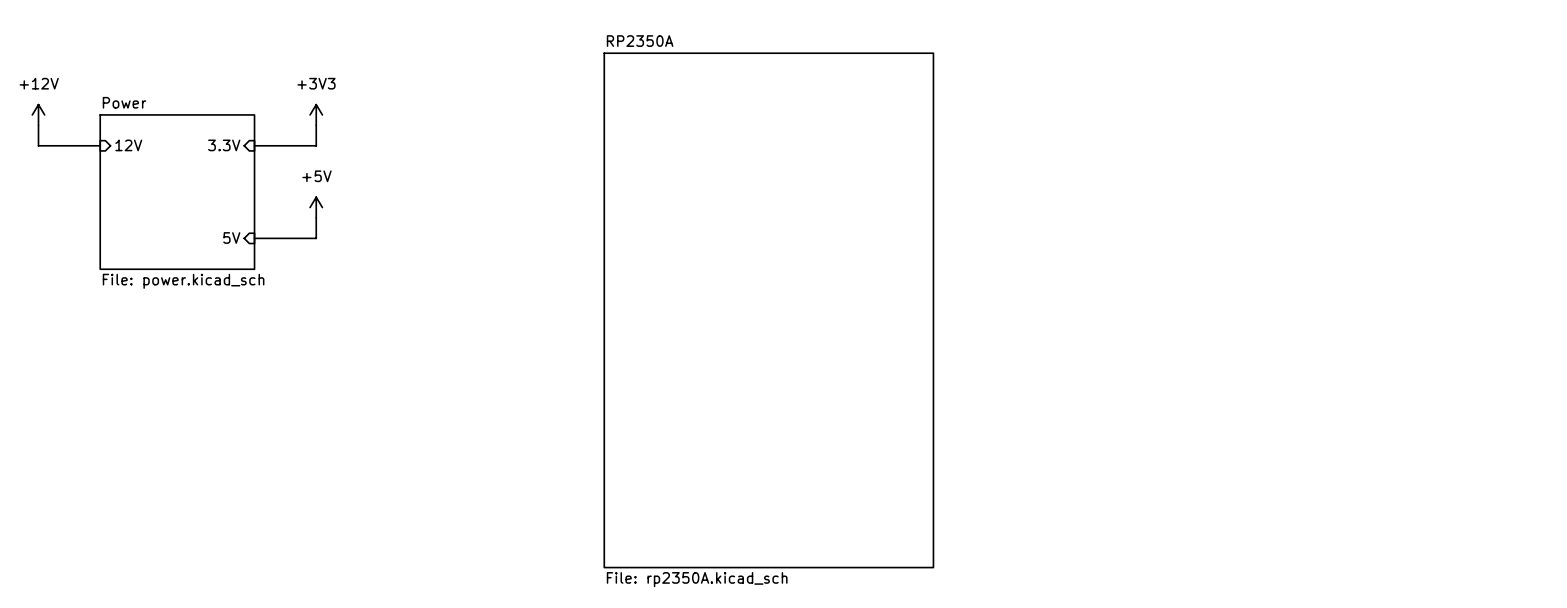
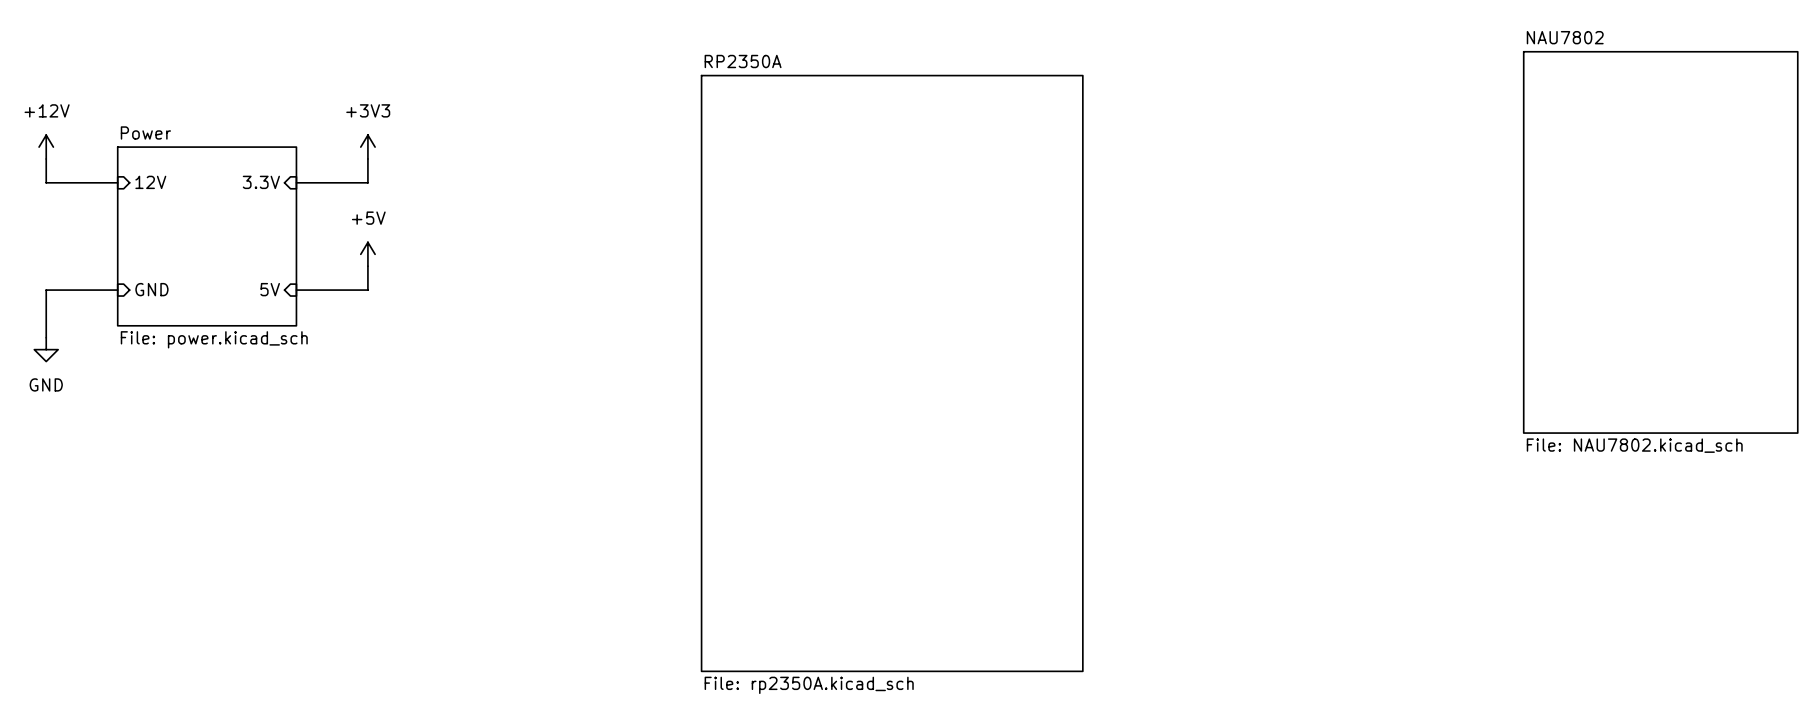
sheet NAU7802: none -> File: NAU7802.kicad_sch (1660, 242)
wire: none -> (117, 290) (46, 290) (46, 337)
sheet pin: none -> GND (151, 289)
power symbol: none -> GND (46, 349)

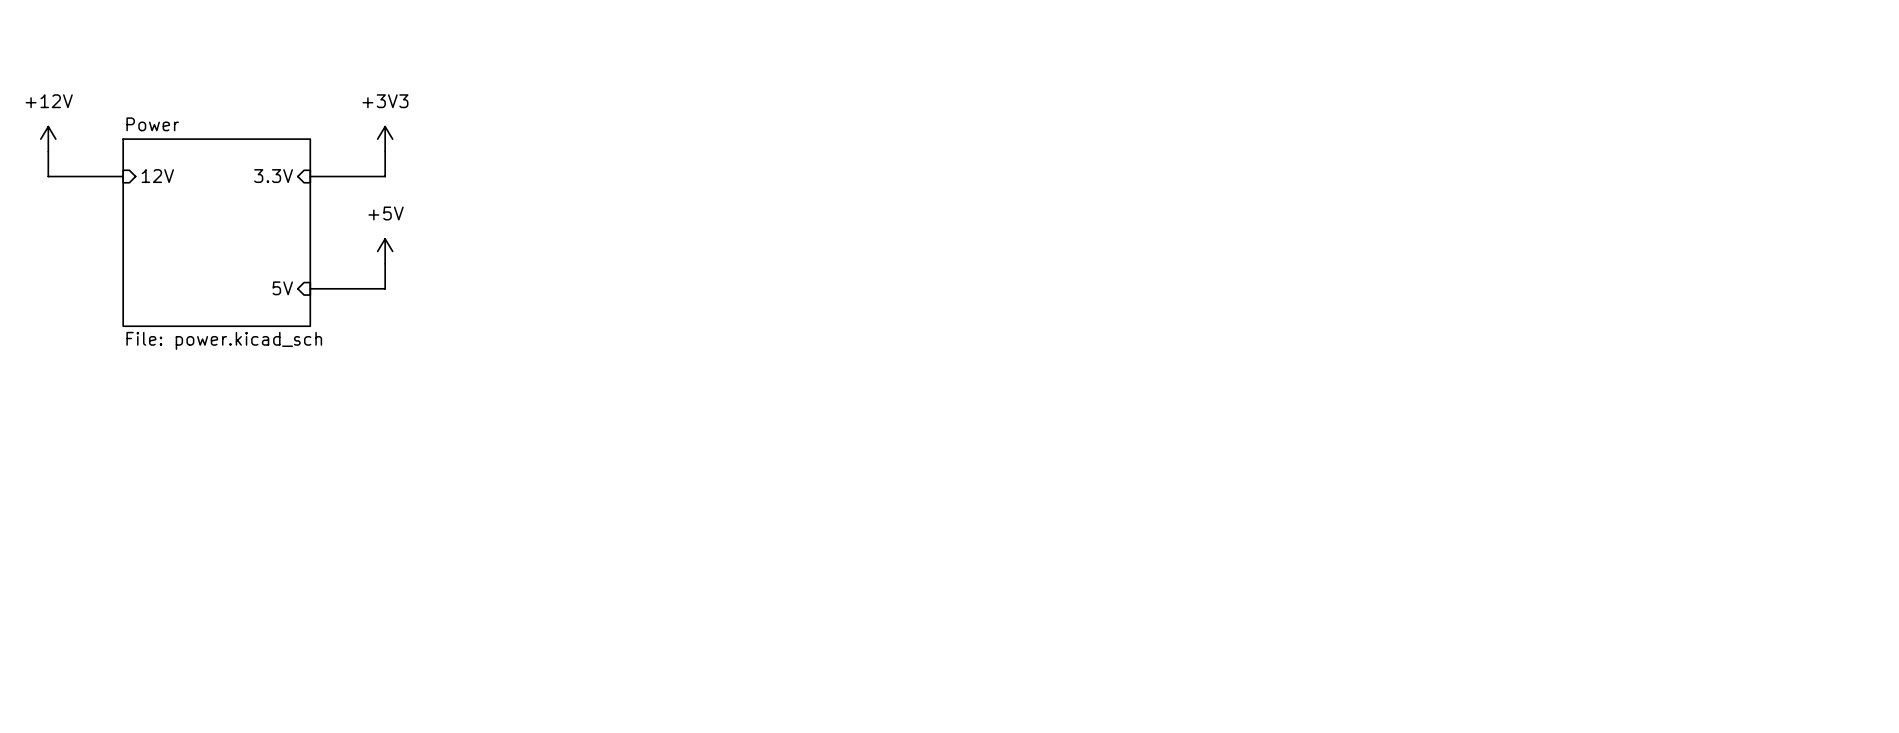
sheet NAU7802: File: NAU7802.kicad_sch (1660, 242) -> none
sheet pin: GND (151, 289) -> none
wire: (117, 290) (46, 290) (46, 337) -> none
power symbol: GND (46, 349) -> none
sheet RP2350A: File: rp2350A.kicad_sch (892, 373) -> none

